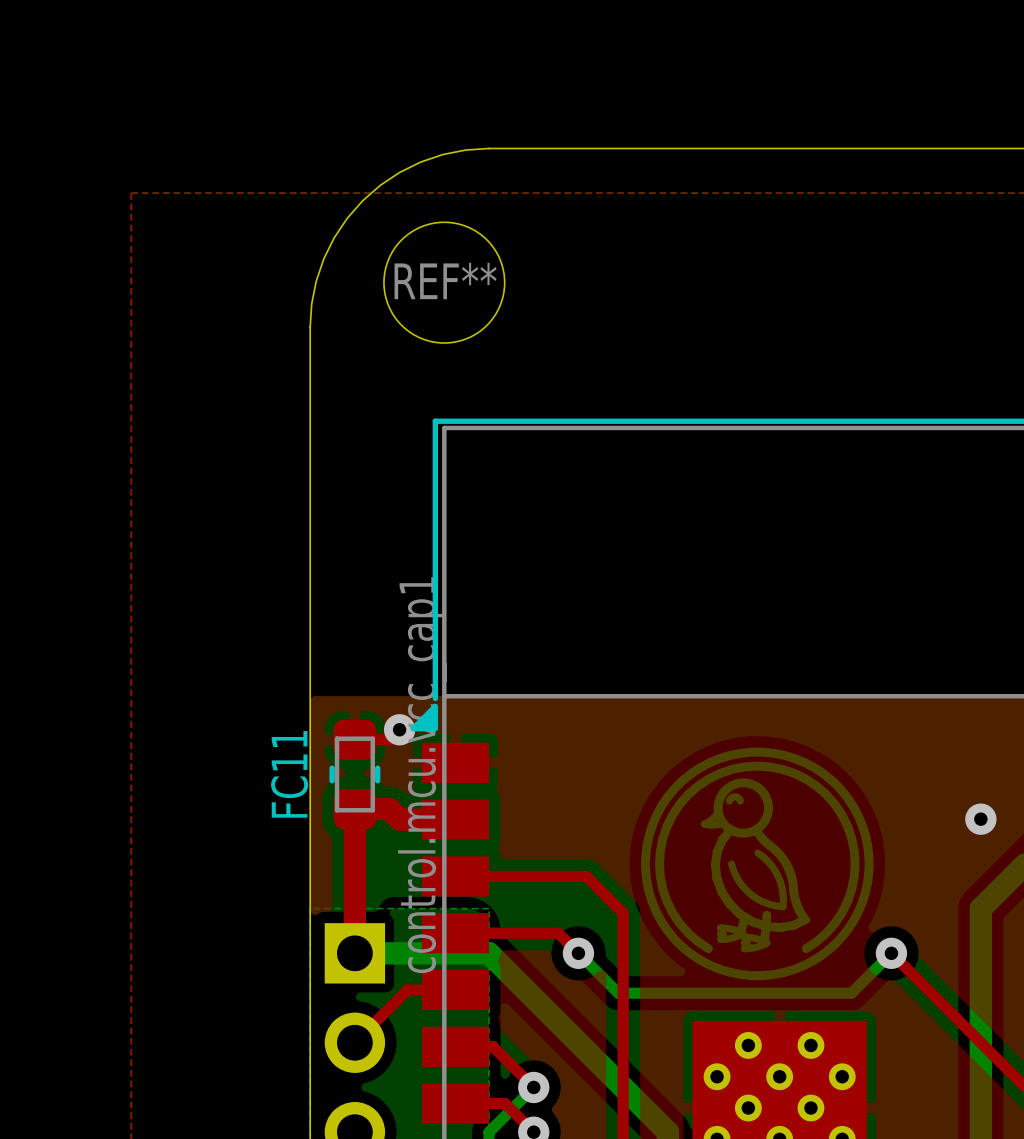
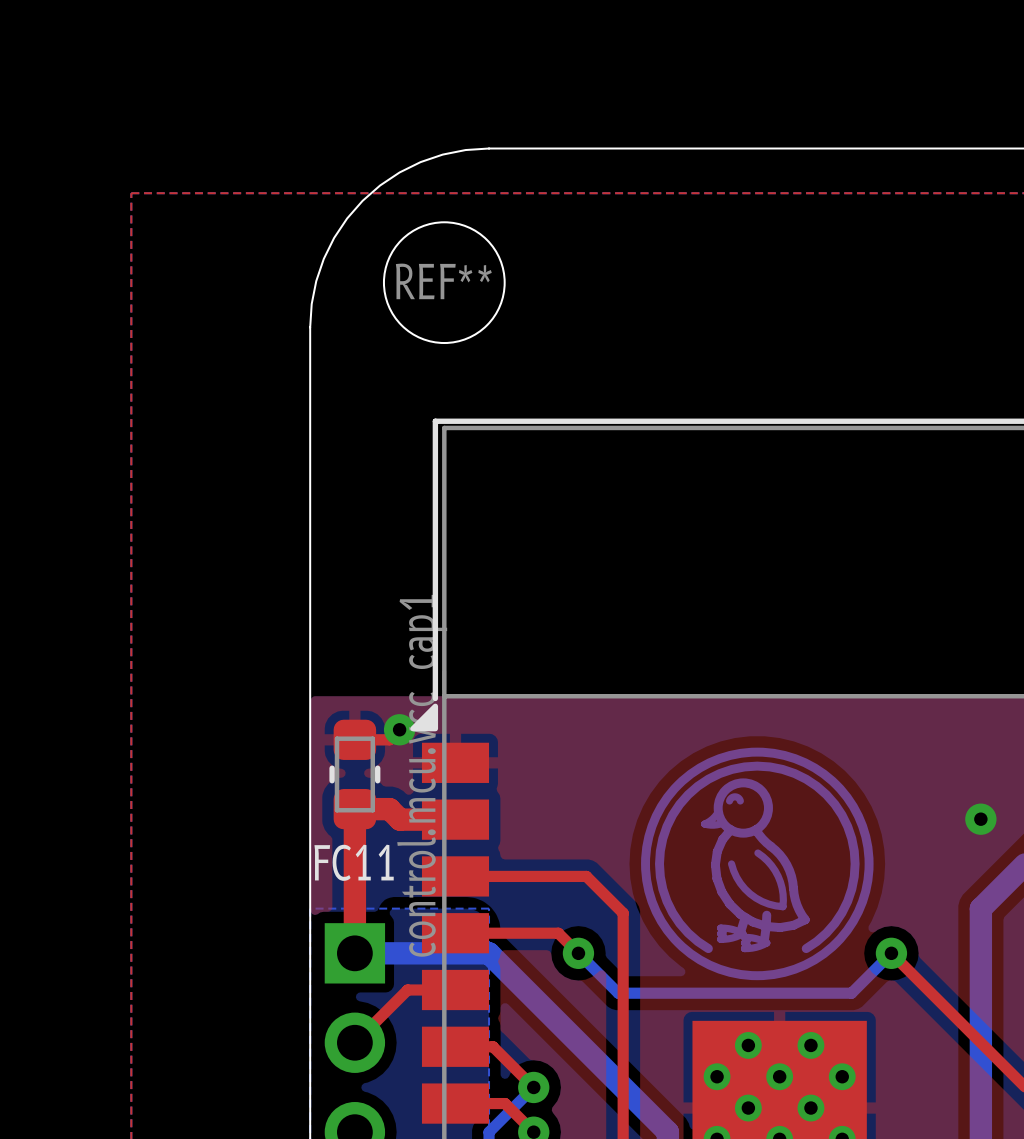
FC11 name rotation: 0° (289, 774) -> 90° clockwise (354, 862)

